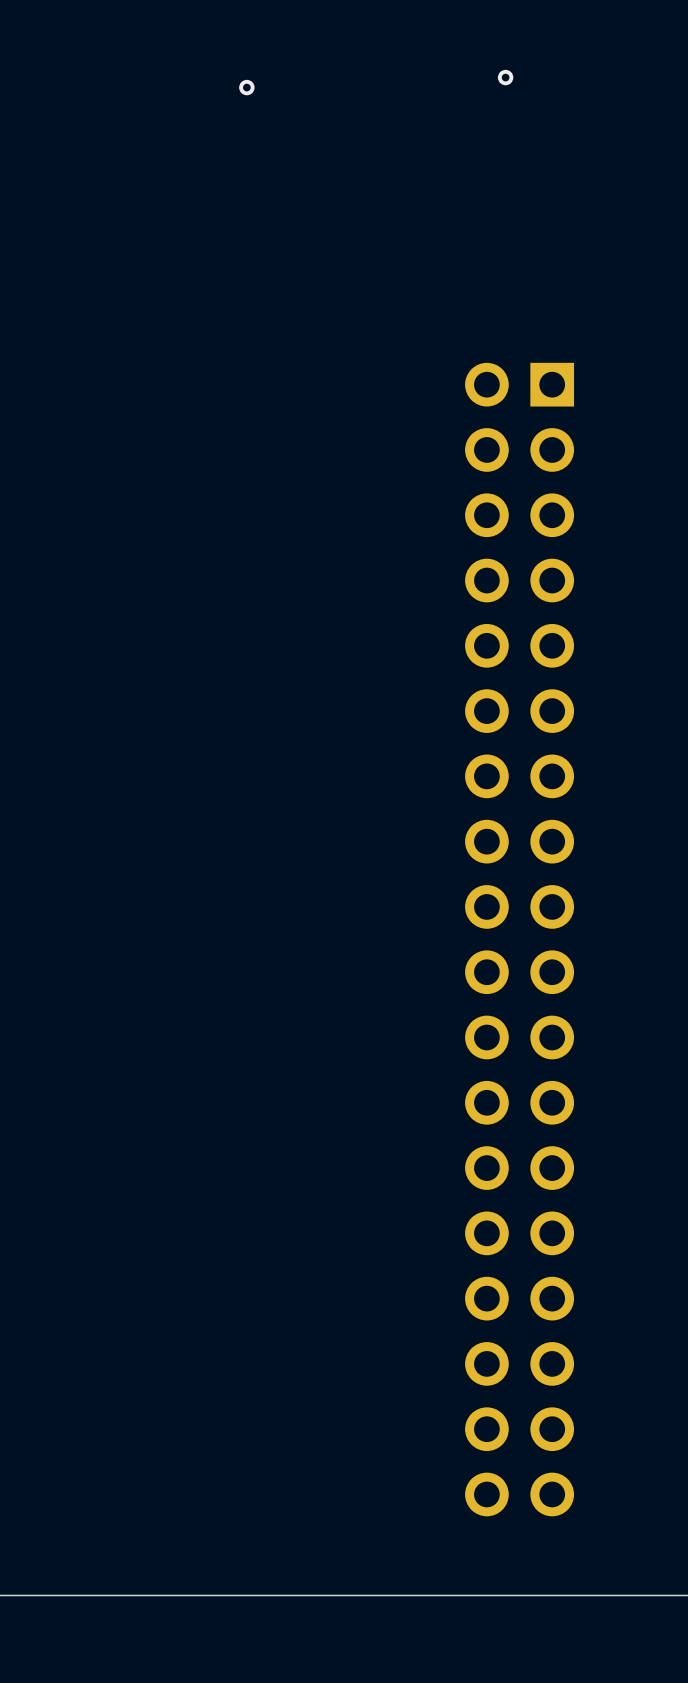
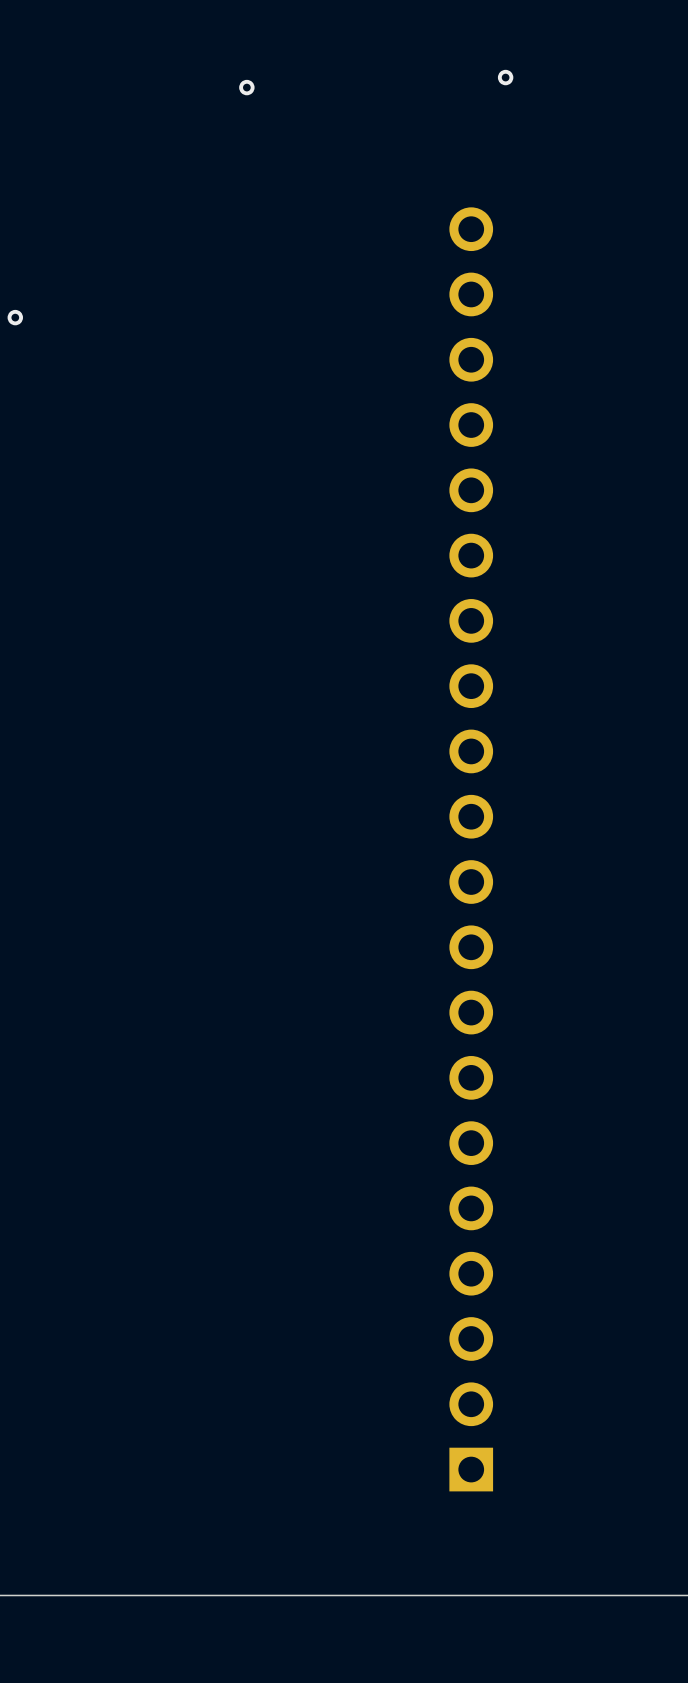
via: none -> (15, 317)
part: none -> (471, 849)
part: (519, 939) -> none

